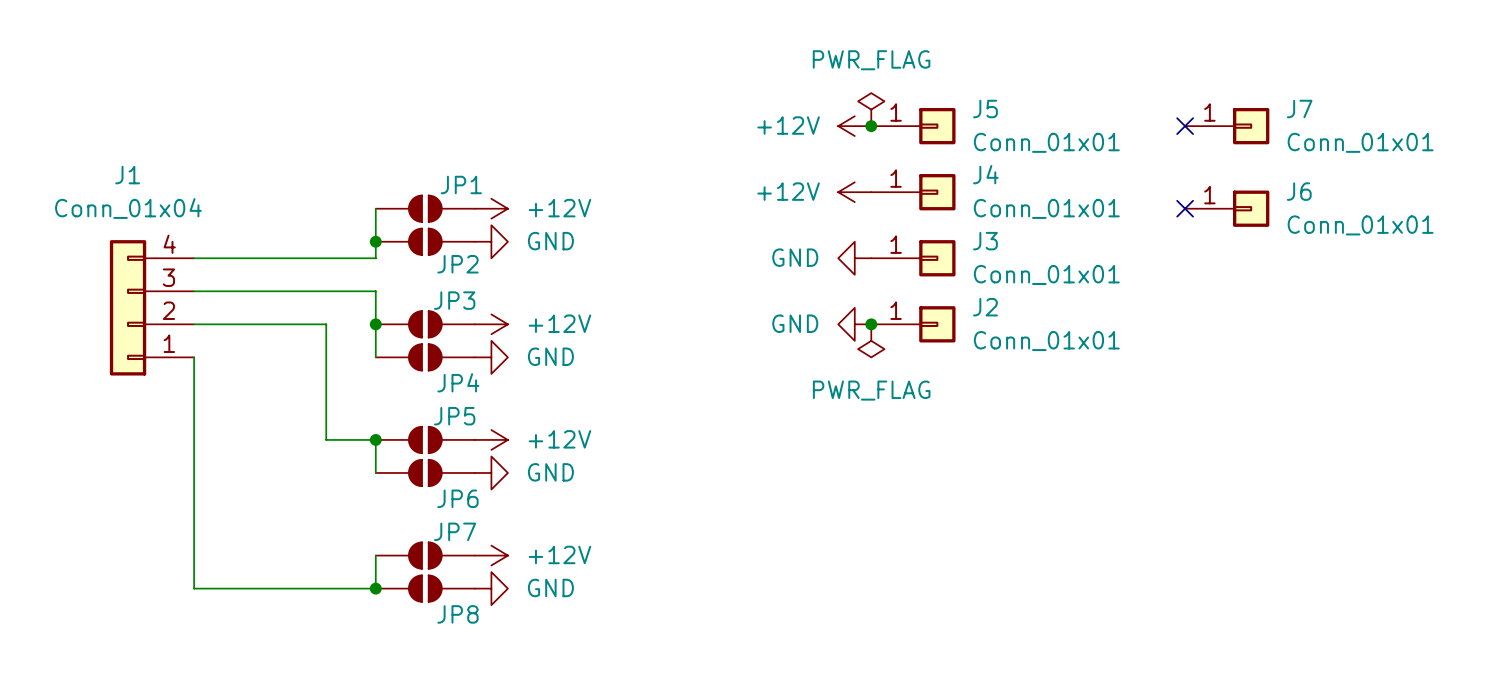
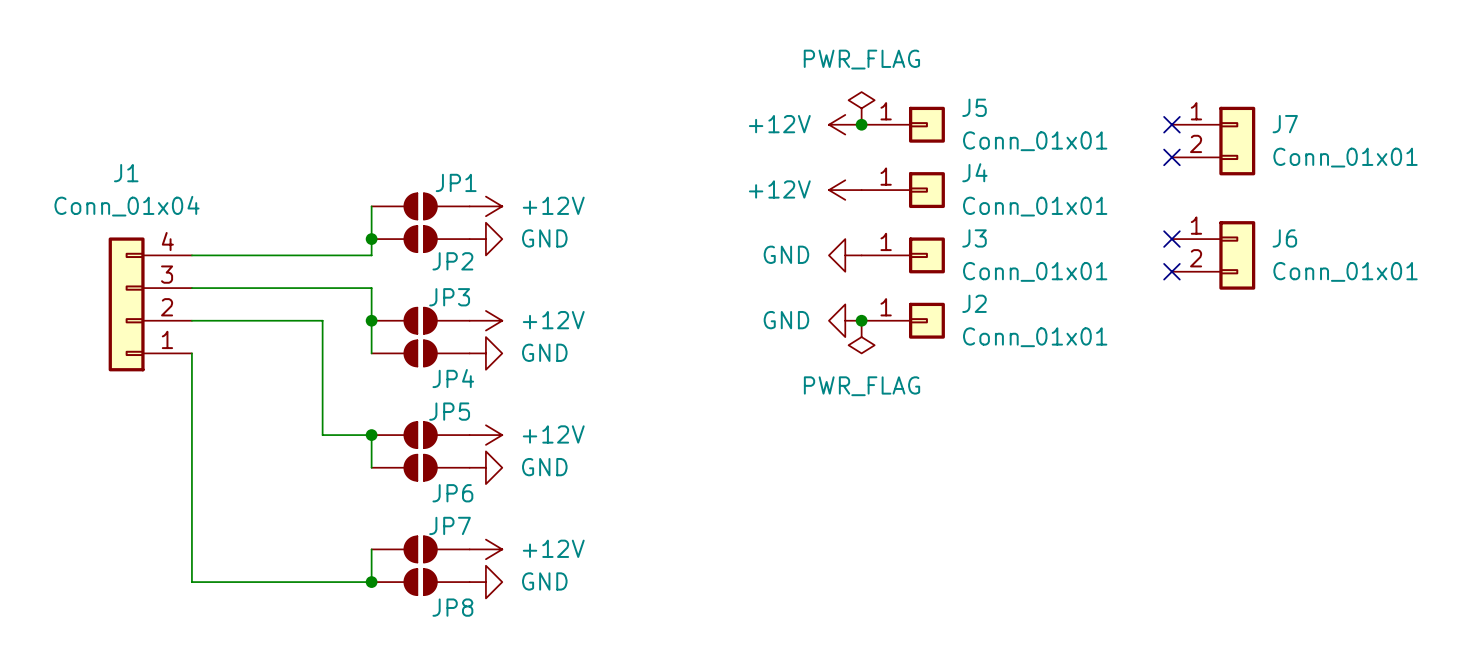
J7 symbol: [1185, 107, 1270, 145] -> [1171, 106, 1256, 176]
no-connect mark: none -> (1171, 157)
J6 symbol: [1185, 190, 1270, 227] -> [1171, 221, 1256, 290]
no-connect mark: (1185, 208) -> none
no-connect mark: none -> (1171, 239)
no-connect mark: none -> (1171, 271)

